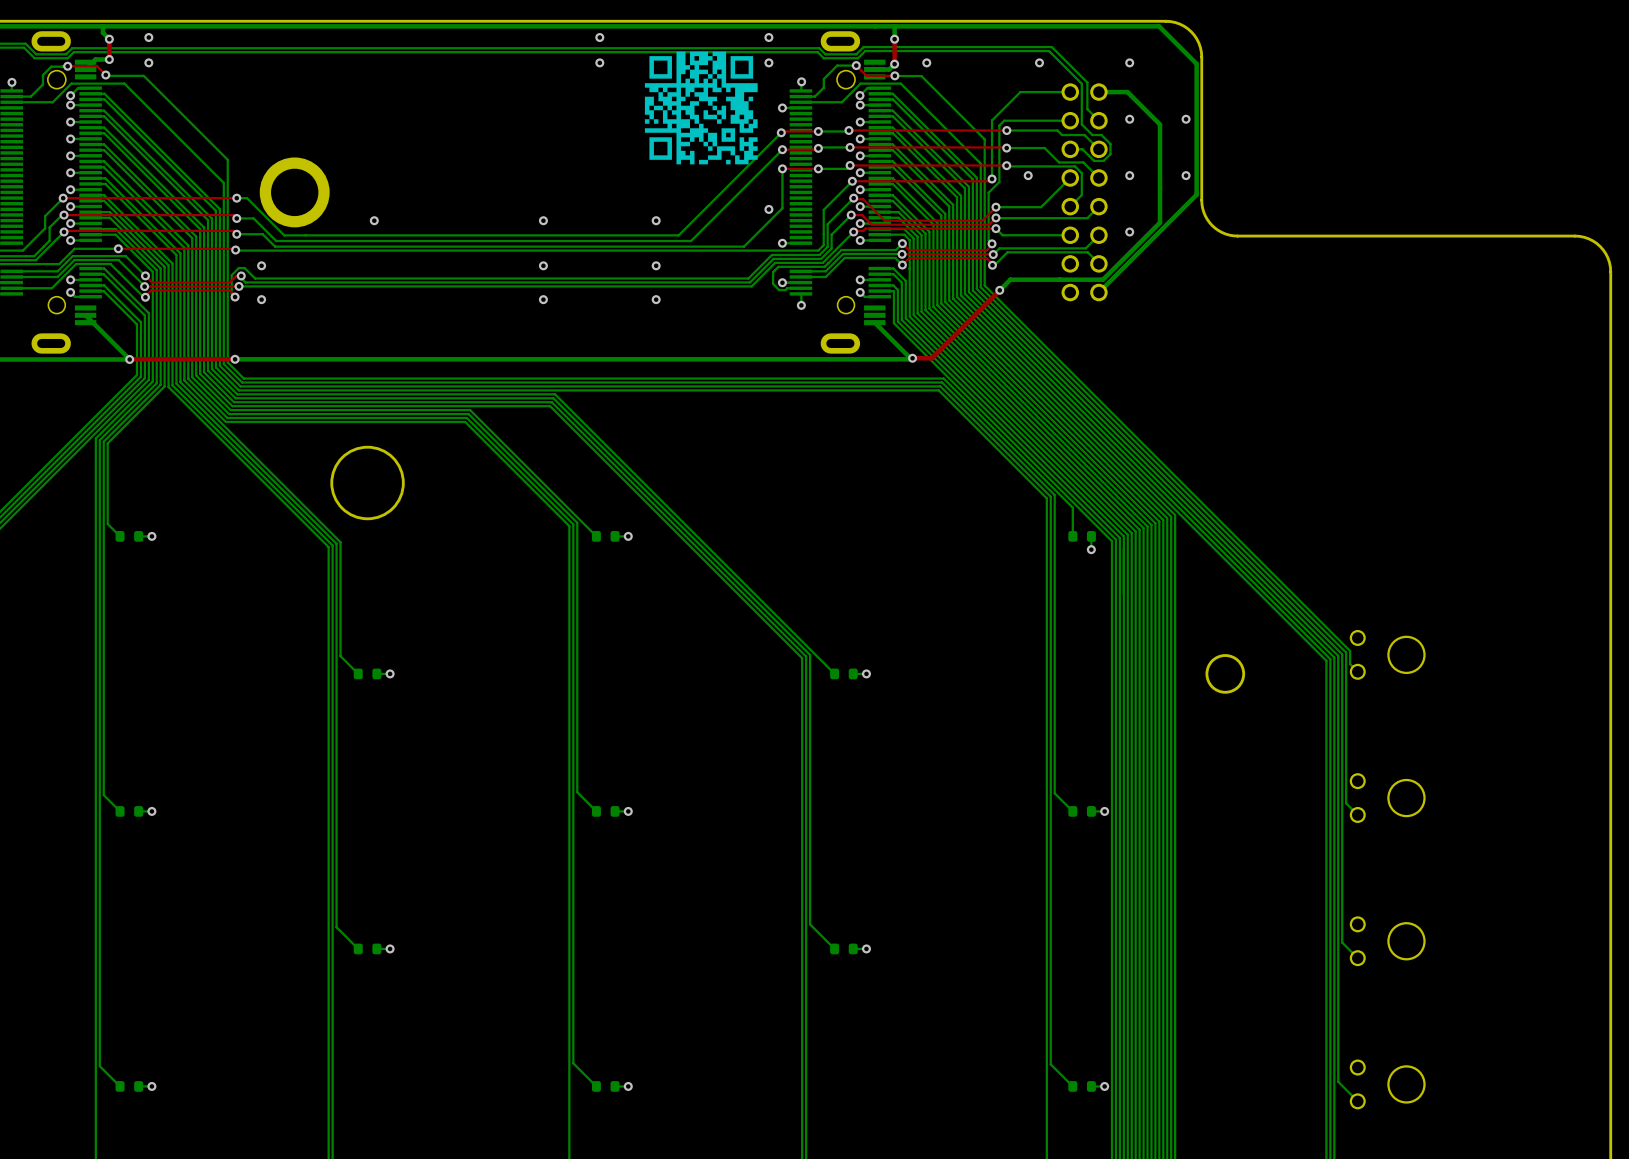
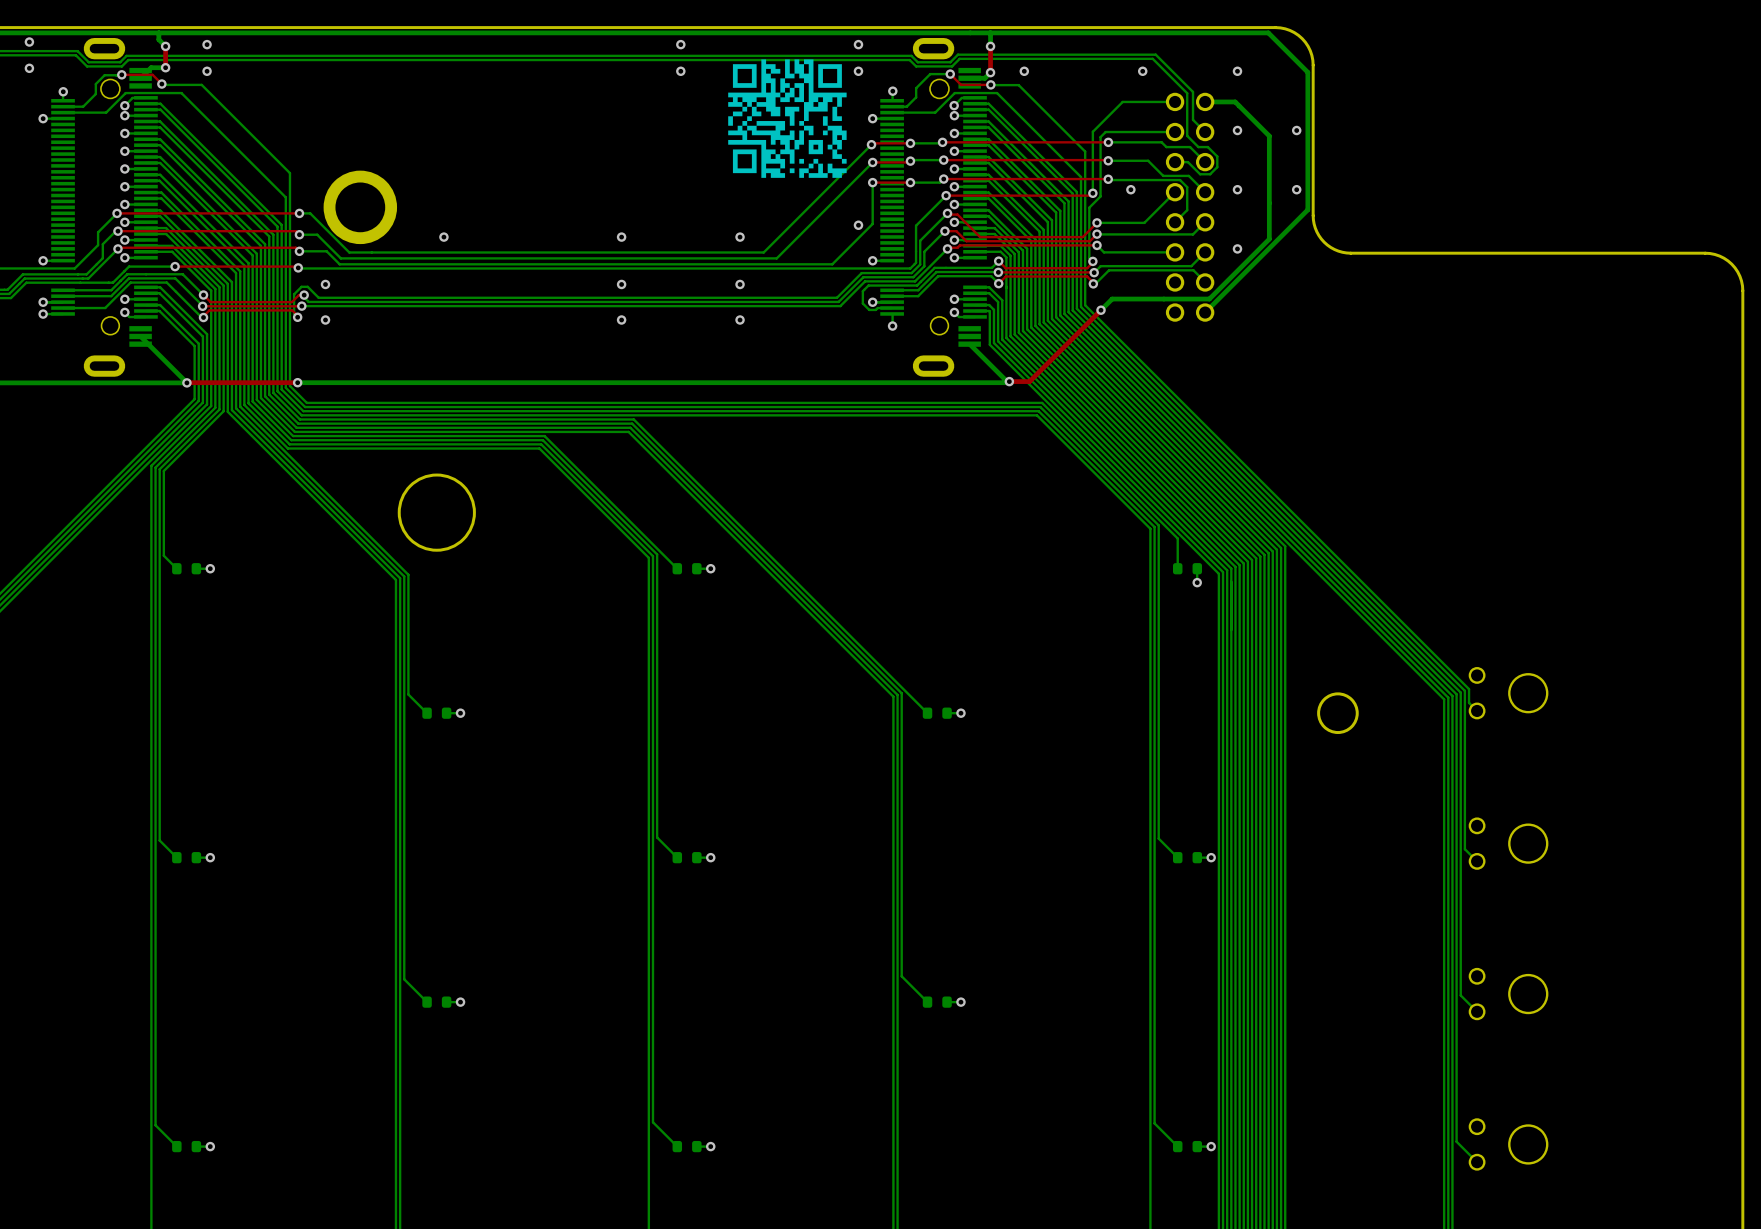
drawing shape: [644, 51, 758, 165] -> [728, 59, 847, 178]

